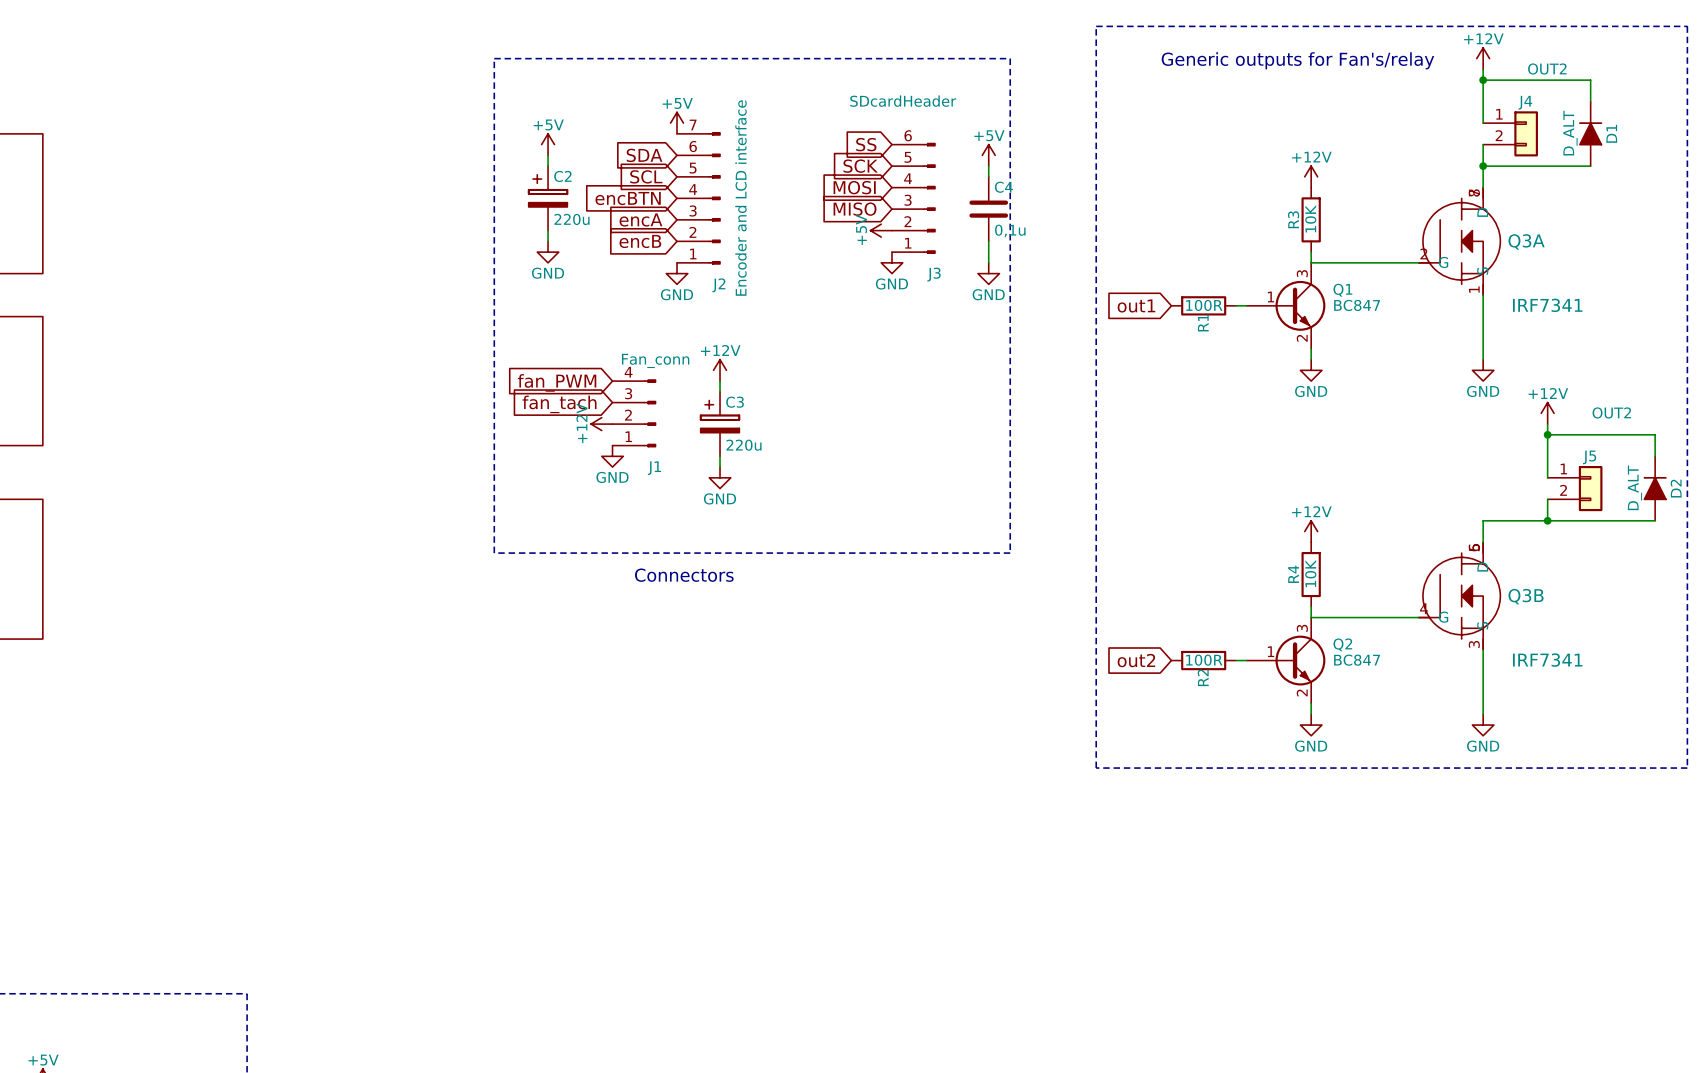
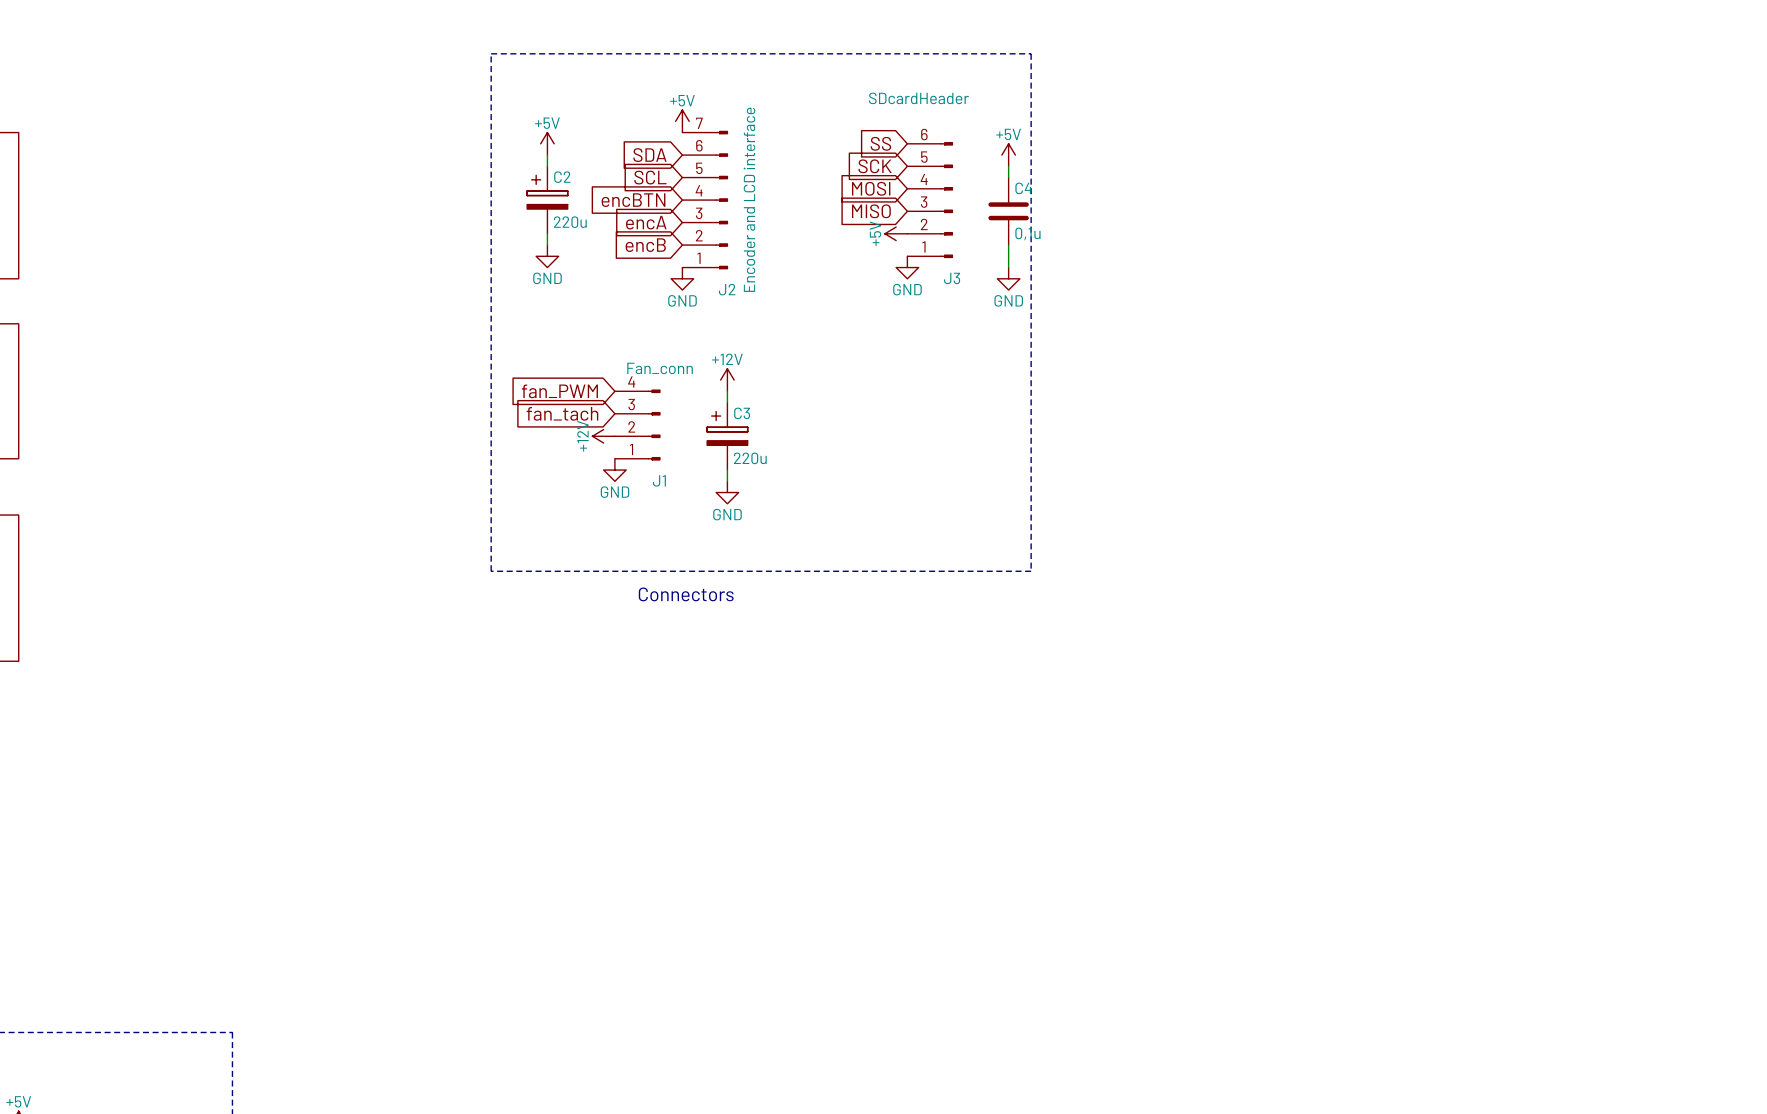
line: (1096, 26) (1096, 768) (1687, 768) (1687, 26) (1096, 26) -> none
power symbol: +12V (1483, 58) -> none
text: Generic outputs for Fan's/relay (1297, 60) -> none
wire: (1483, 69) (1483, 123) -> none
wire: (1483, 80) (1590, 80) (1590, 101) -> none
junction: (1483, 80) -> none
J4: OUT2 (1510, 133) -> none
D1: D_ALT (1590, 133) -> none
wire: (1483, 144) (1483, 187) -> none
wire: (1483, 166) (1590, 166) -> none
junction: (1483, 166) -> none
power symbol: +12V (1311, 176) -> none
R3: 10K (1311, 219) -> none
Q3A: IRF7341 (1459, 241) -> none
wire: (1311, 252) (1311, 262) (1418, 262) -> none
wire: (1483, 295) (1483, 359) -> none
global label: out1 (1136, 305) -> none
R1: 100R (1203, 305) -> none
wire: (1235, 305) (1246, 305) -> none
Q1: BC847 (1286, 305) -> none
wire: (1311, 348) (1311, 359) -> none
power symbol: GND (1311, 370) -> none
power symbol: GND (1483, 370) -> none
power symbol: +12V (1547, 413) -> none
wire: (1547, 424) (1547, 477) -> none
wire: (1547, 434) (1655, 434) (1655, 456) -> none
junction: (1547, 434) -> none
J5: OUT2 (1575, 488) -> none
D2: D_ALT (1655, 488) -> none
wire: (1547, 499) (1547, 520) -> none
junction: (1547, 520) -> none
wire: (1655, 520) (1483, 520) (1483, 542) -> none
power symbol: +12V (1311, 531) -> none
R4: 10K (1311, 574) -> none
Q3B: IRF7341 (1459, 596) -> none
wire: (1311, 606) (1311, 617) (1418, 617) -> none
wire: (1483, 649) (1483, 714) -> none
global label: out2 (1136, 660) -> none
R2: 100R (1203, 660) -> none
wire: (1235, 660) (1246, 660) -> none
Q2: BC847 (1286, 660) -> none
wire: (1311, 703) (1311, 714) -> none
power symbol: GND (1311, 725) -> none
power symbol: GND (1483, 725) -> none

